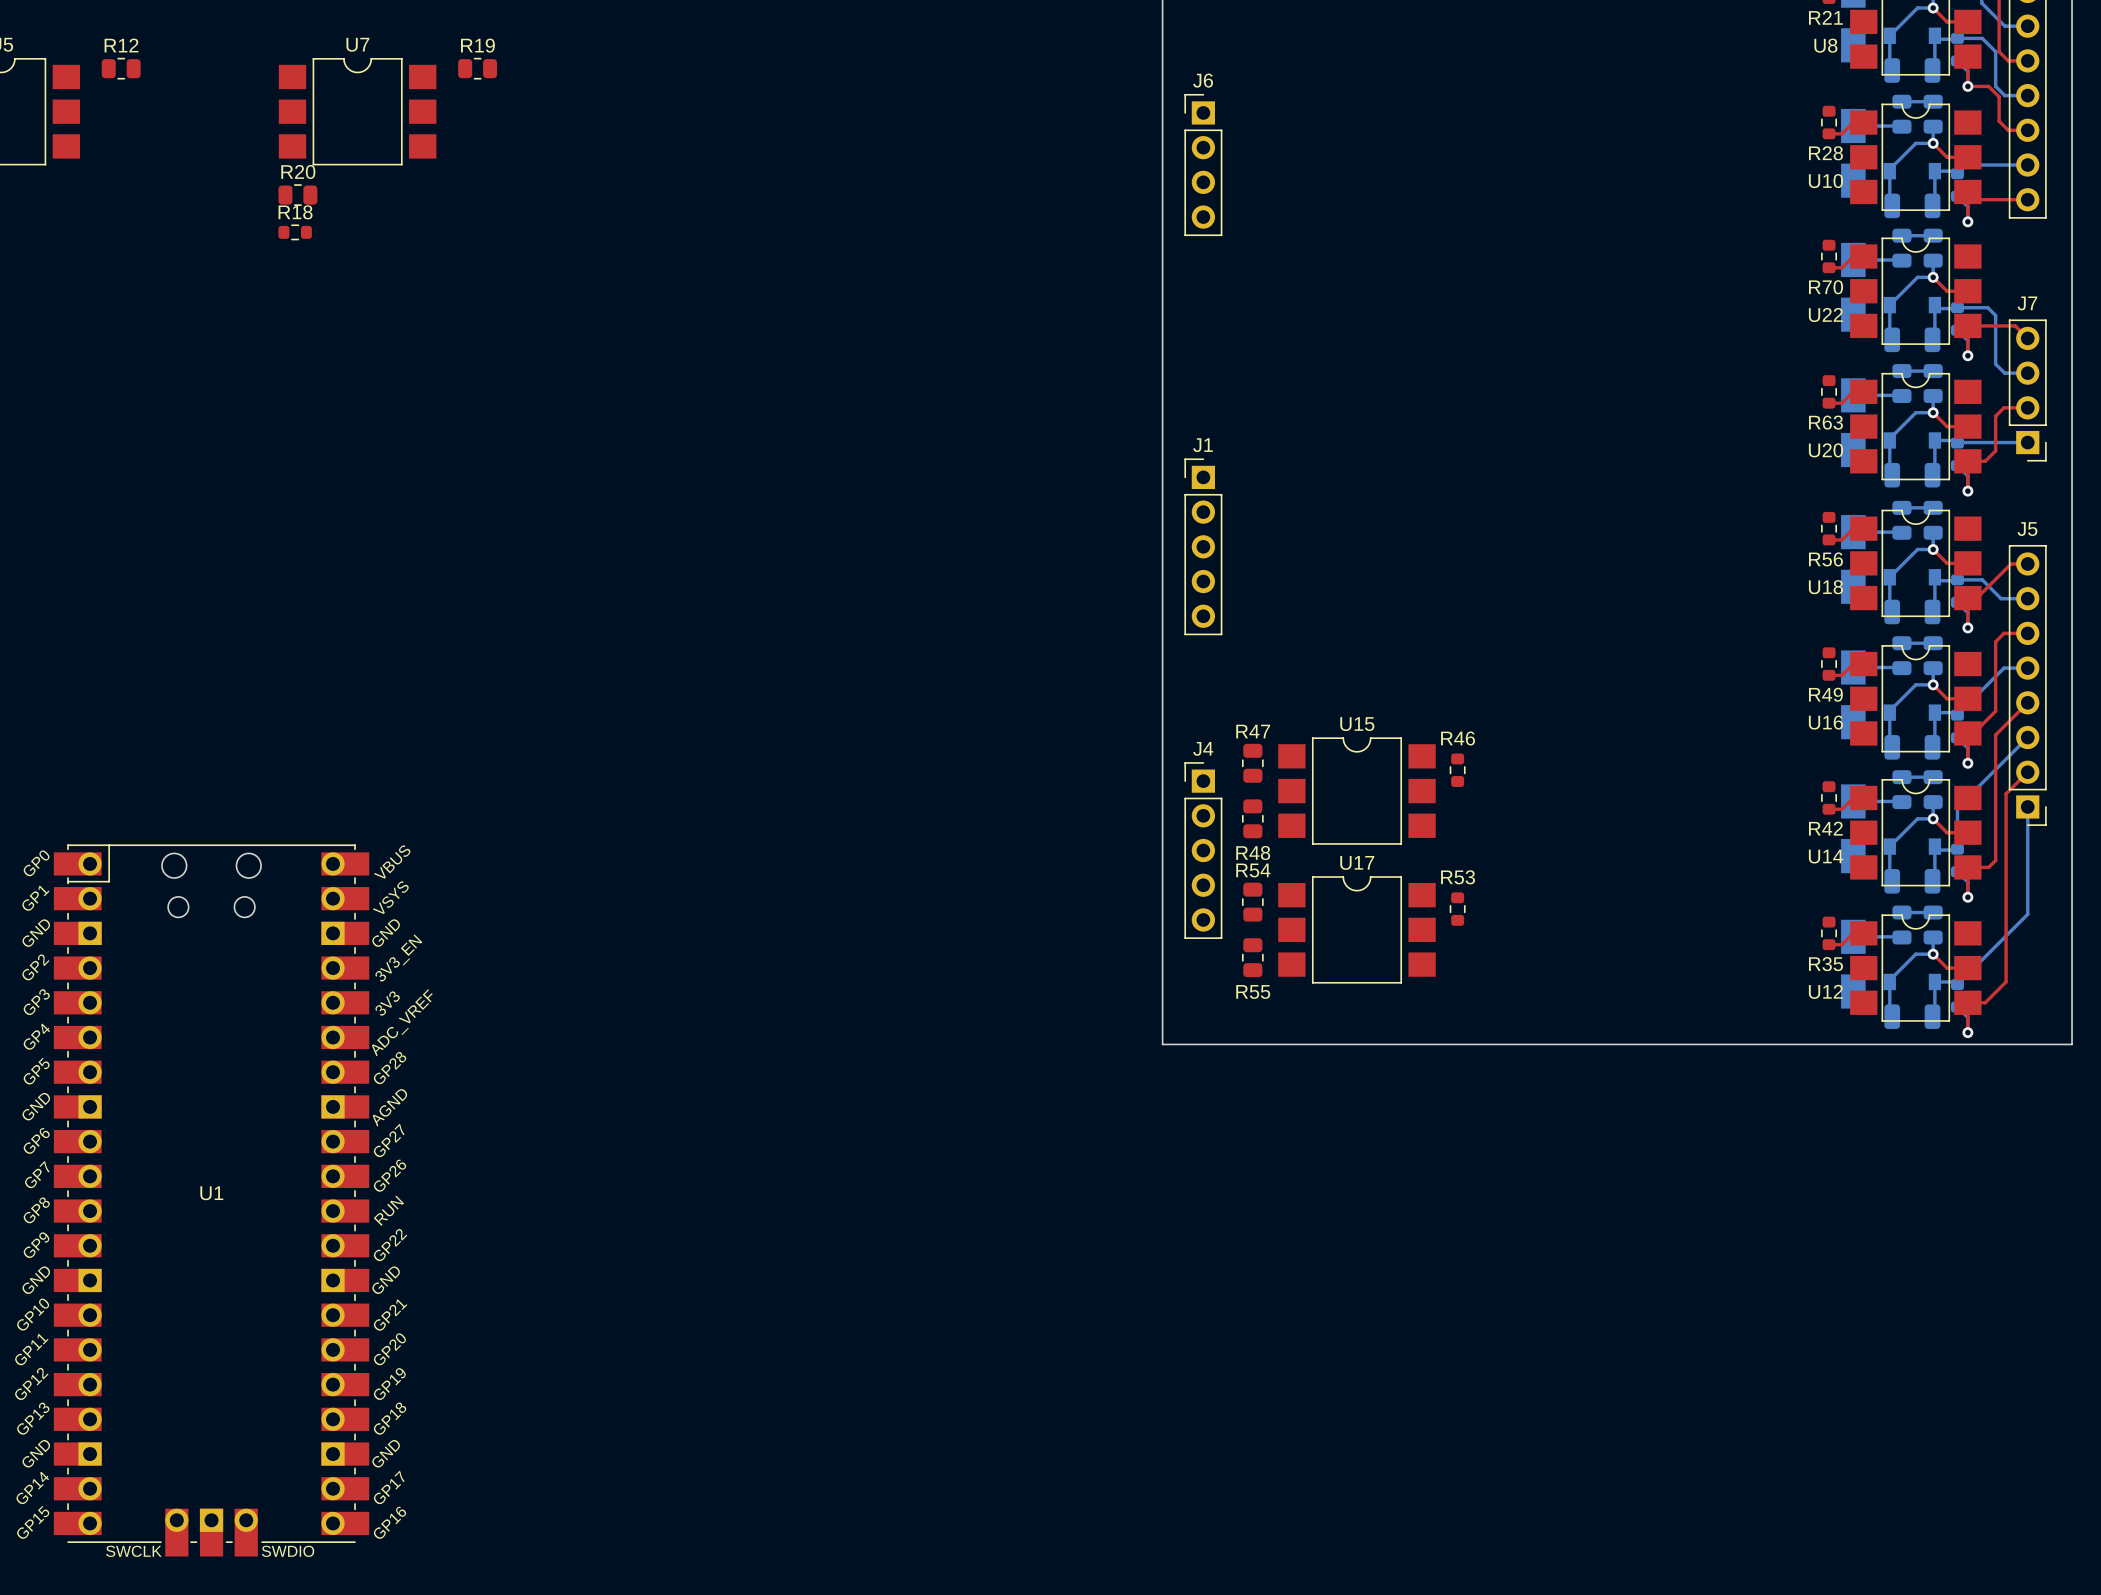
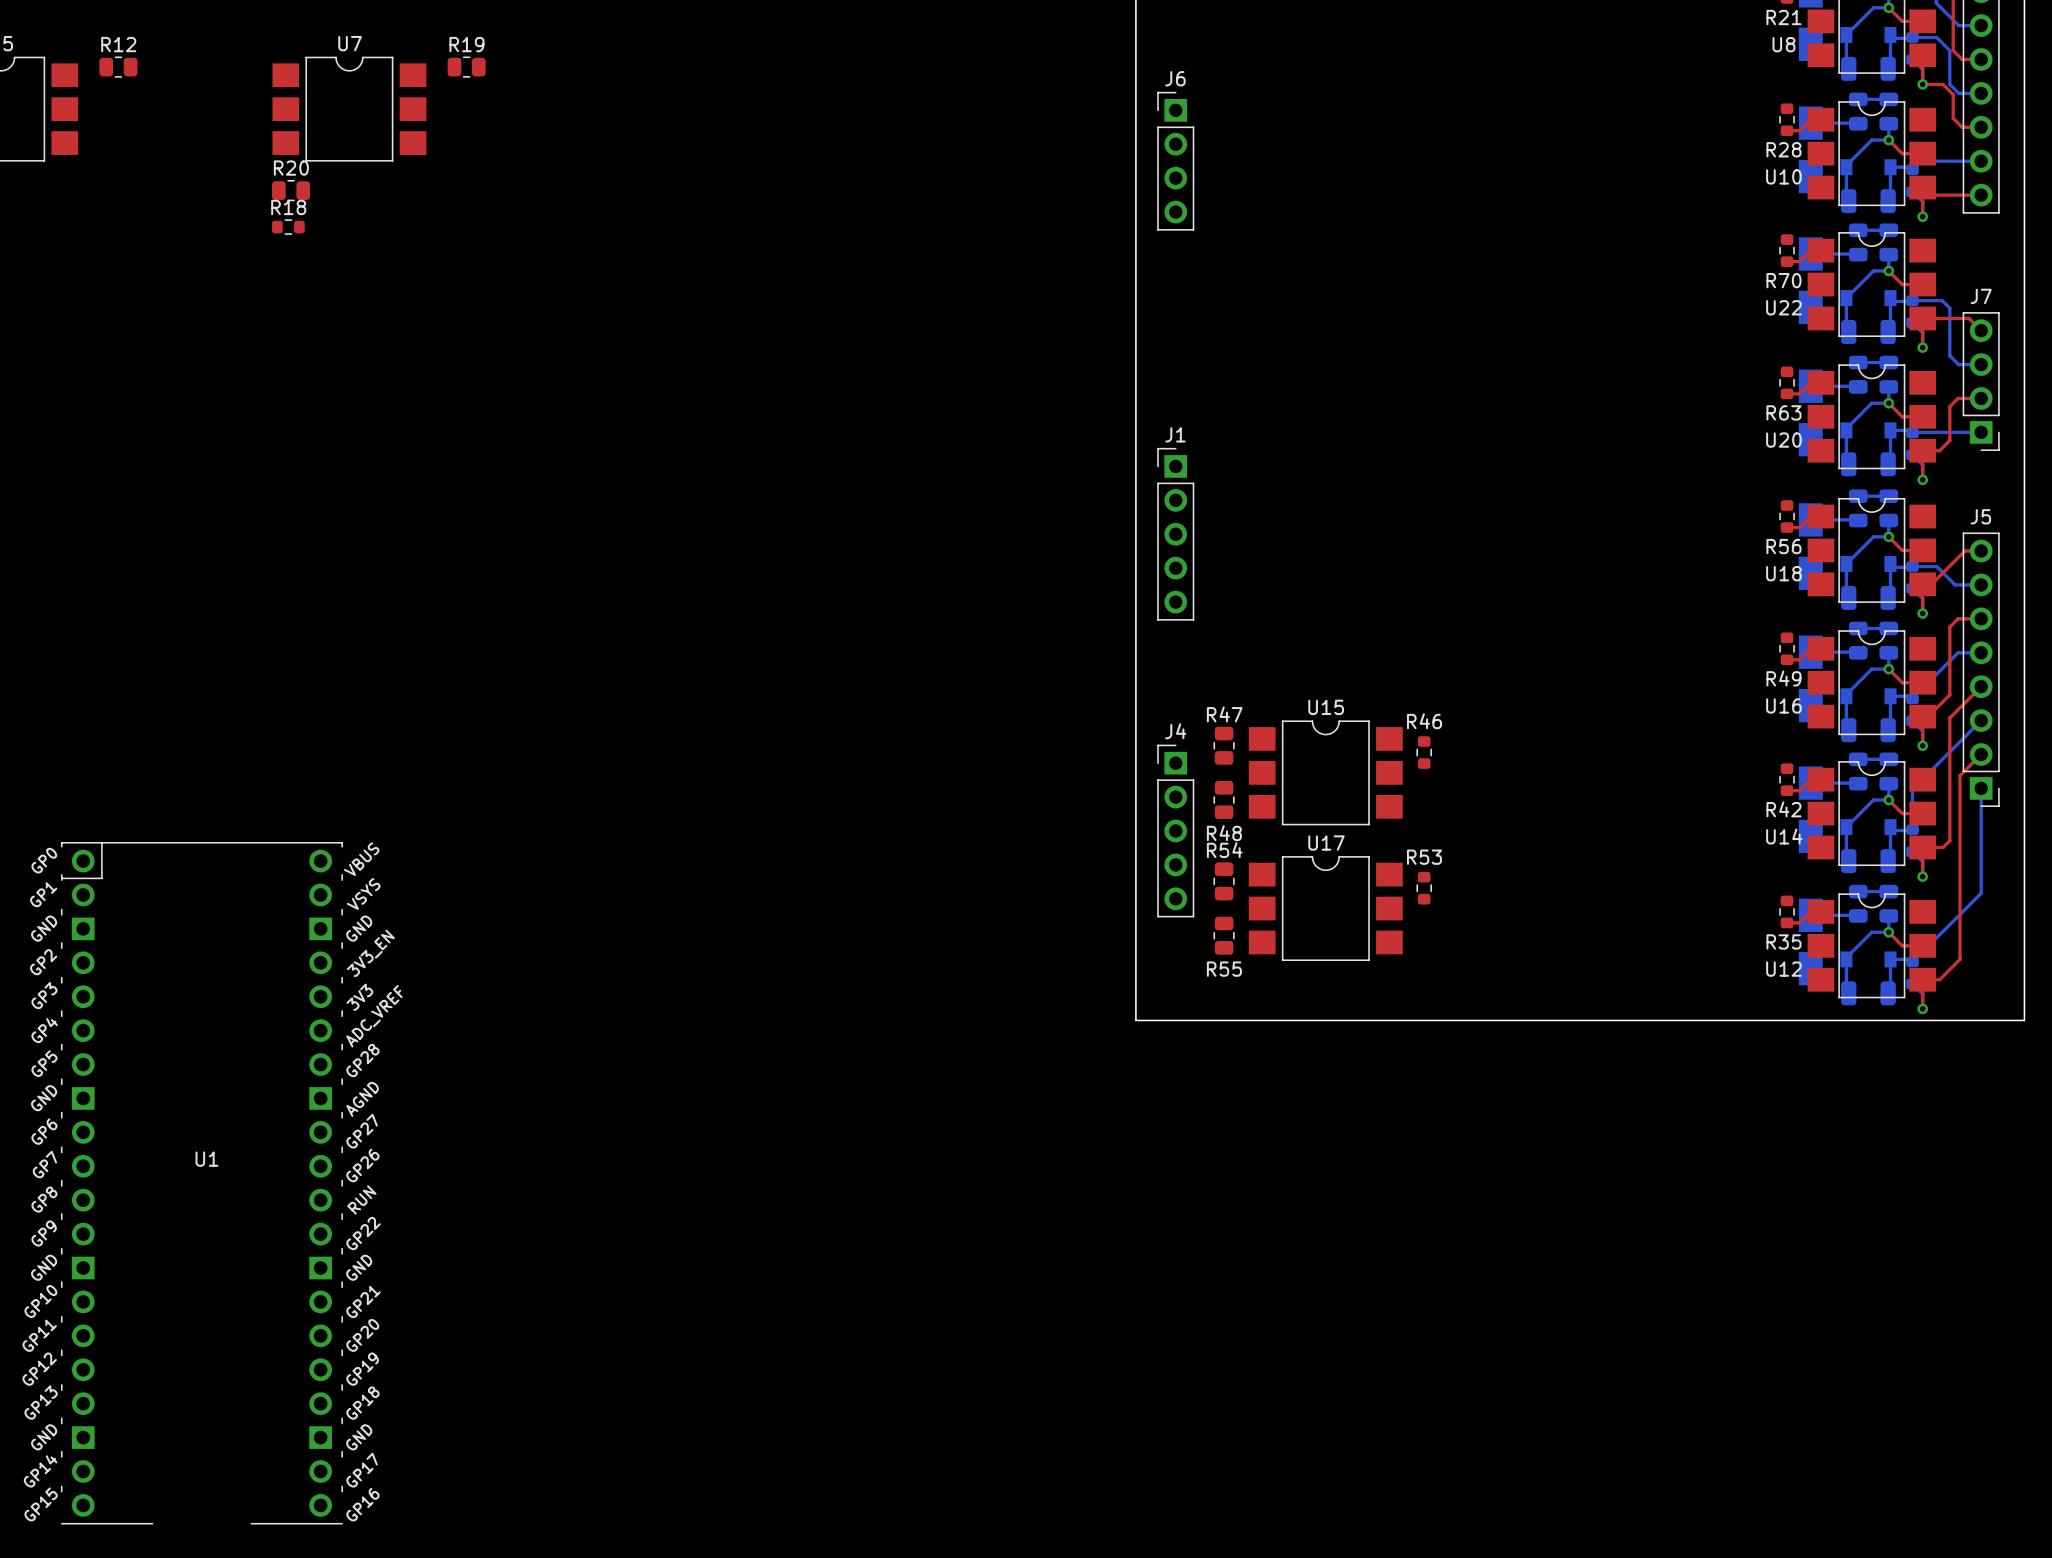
U1 footprint: [53, 844, 370, 1557] -> [60, 841, 343, 1525]

